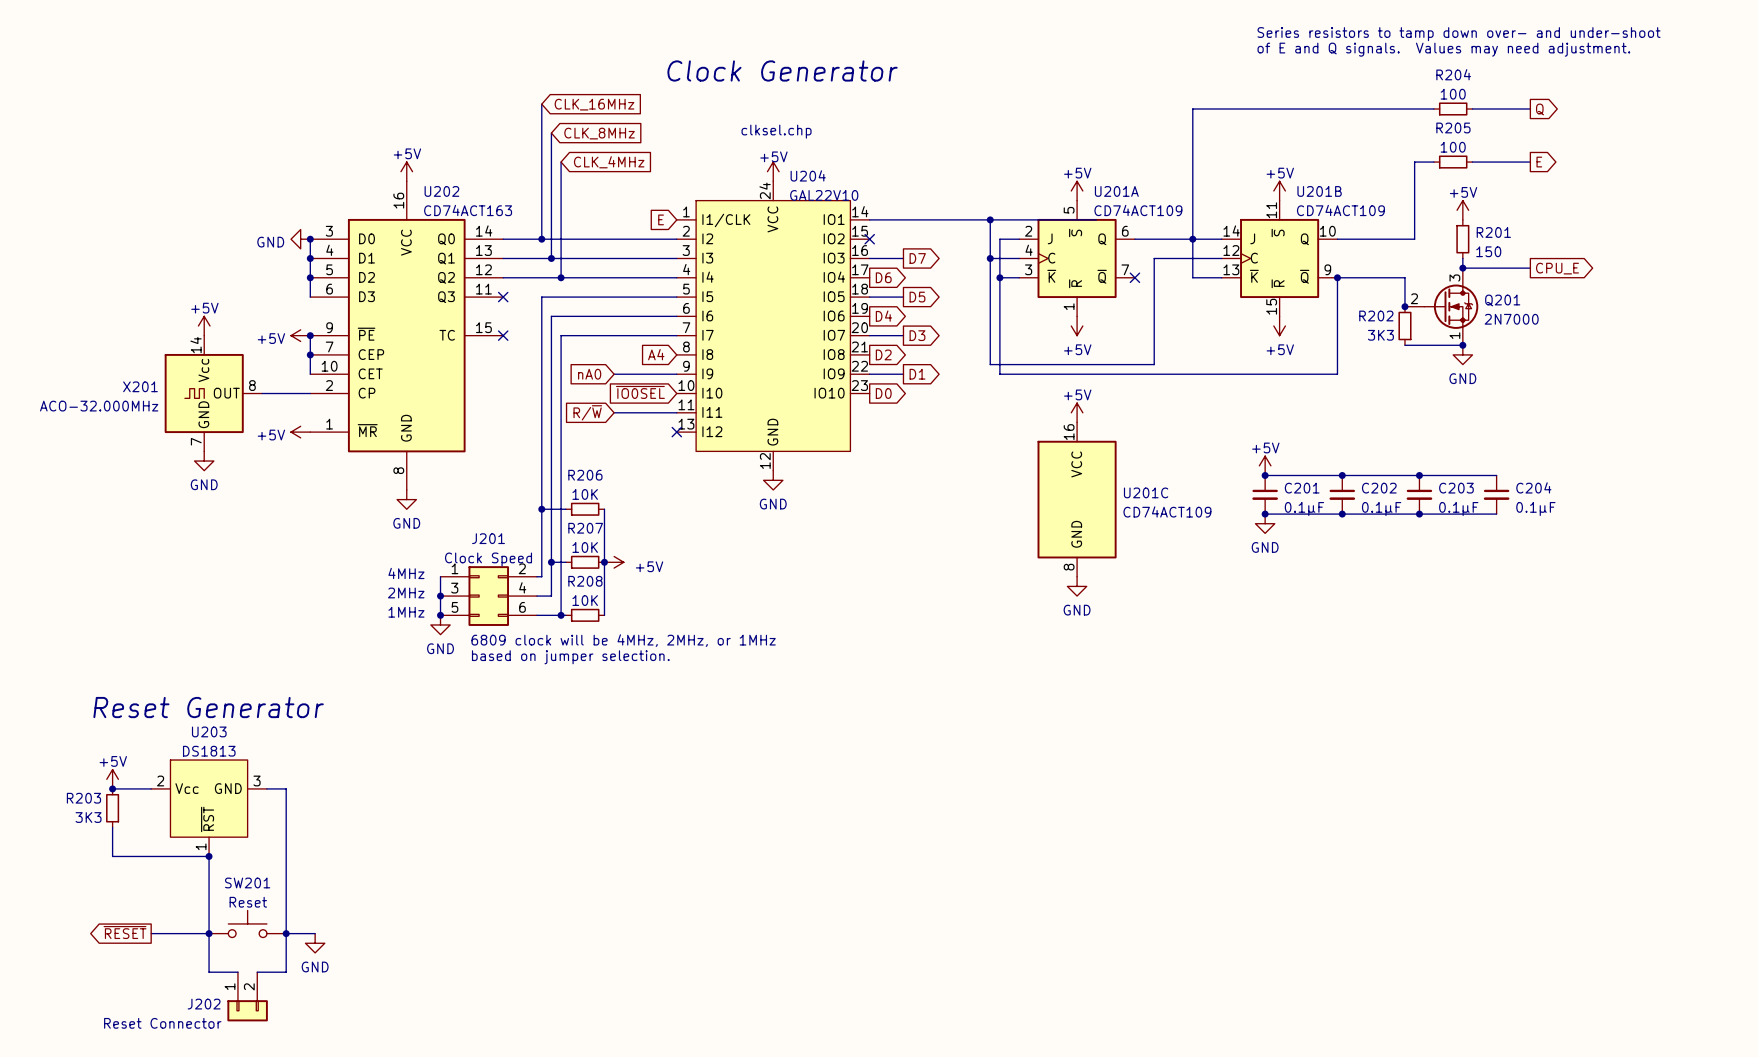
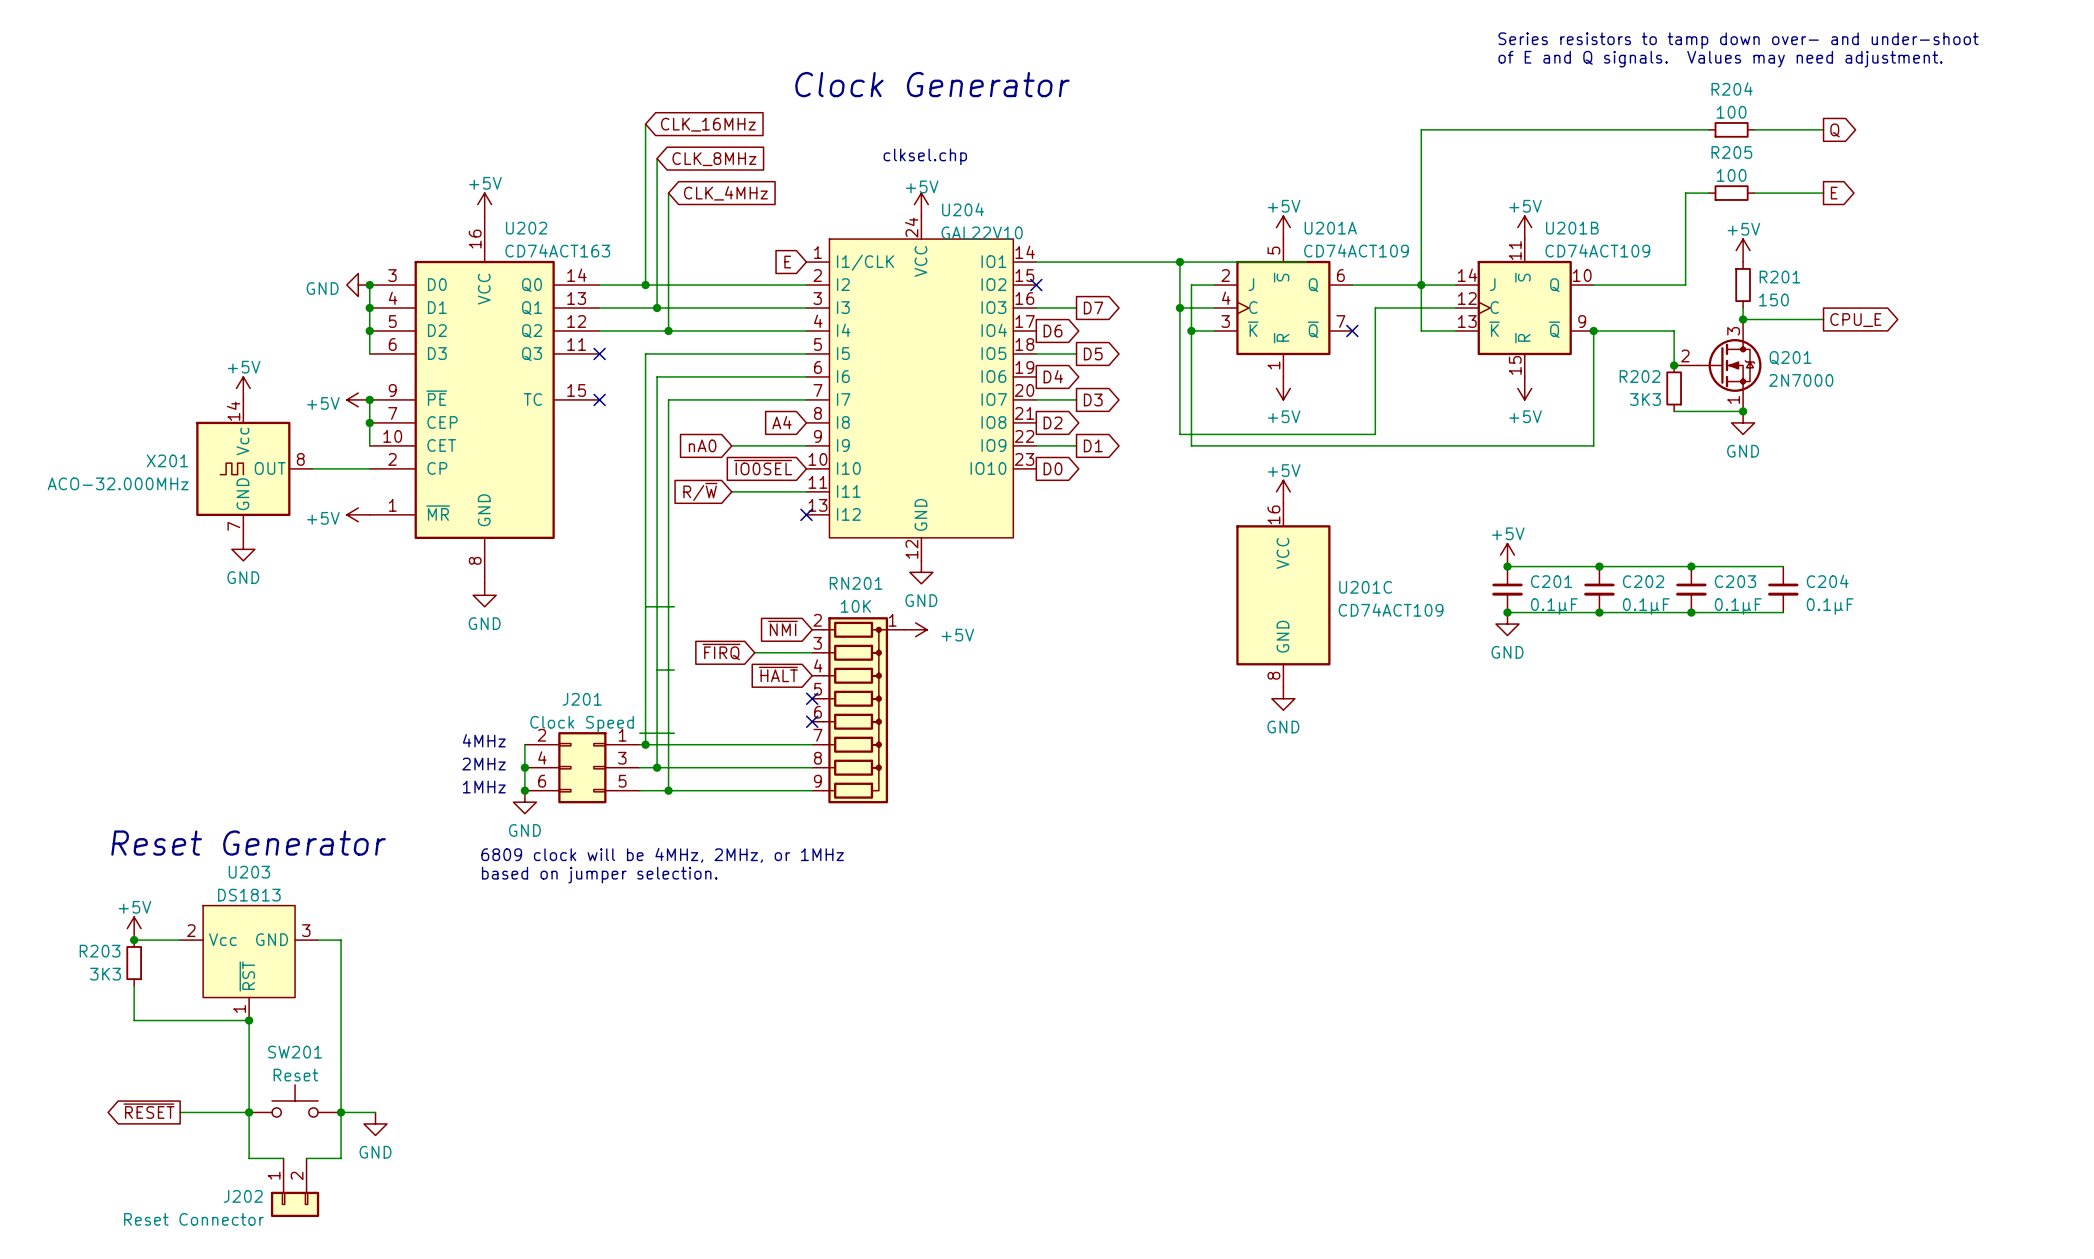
junction: (541, 509) -> none
R206: 10K (585, 509) -> none
wire: (604, 509) (604, 615) -> none
global label: none -> ~{NMI} (783, 628)
global label: none -> ~{FIRQ} (721, 652)
wire: none -> (754, 652) (812, 652)
junction: (551, 562) -> none
R207: 10K (585, 562) -> none
junction: (604, 562) -> none
power symbol position: +5V (614, 562) -> +5V (915, 629)
global label: none -> ~{HALT} (778, 674)
text position: 4MHz (406, 573) -> 4MHz (484, 740)
wire: (440, 576) (440, 615) -> (524, 744) (524, 790)
wire: (536, 576) (541, 576) -> (645, 744) (645, 687)
no-connect mark: none -> (812, 698)
text position: 2MHz (406, 592) -> 2MHz (484, 764)
junction: (440, 596) -> none
J201 flip: as is (488, 596) -> left-right (582, 767)
wire: (536, 596) (551, 596) -> (657, 767) (657, 710)
RN201: none -> 10K (858, 710)
no-connect mark: none -> (812, 721)
text position: 1MHz (406, 612) -> 1MHz (484, 787)
junction: (440, 615) -> none
wire: none -> (668, 733) (668, 790)
junction: (561, 615) -> none
R208: 10K (585, 615) -> none
power symbol position: GND (440, 624) -> GND (524, 802)
wire: none -> (639, 744) (812, 744)
junction: none -> (645, 744)
text position: 6809 clock will be 4MHz, 2MHz, or 1MHz (623, 640) -> 6809 clock will be 4MHz, 2MHz, or 1MHz (662, 855)
junction: none -> (524, 767)
wire: none -> (639, 767) (812, 767)
junction: none -> (657, 767)
text position: based on jumper selection. (570, 657) -> based on jumper selection. (599, 875)
junction: none -> (524, 790)
wire: none -> (639, 790) (812, 790)
junction: none -> (668, 790)

